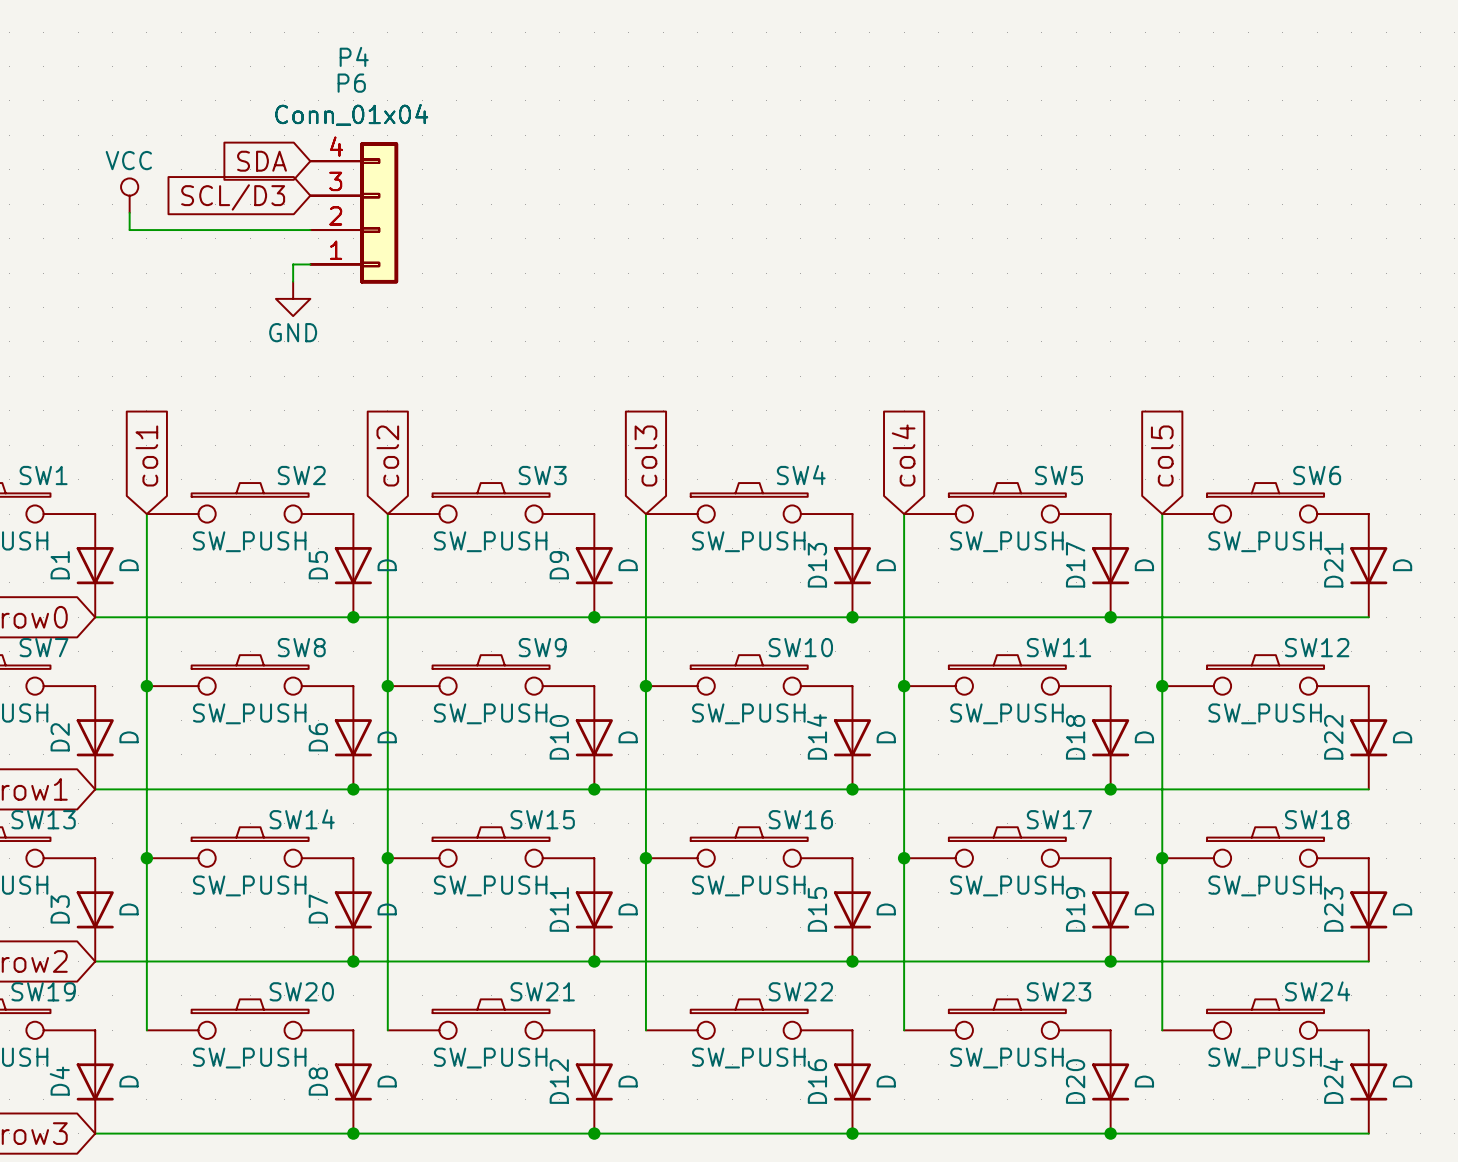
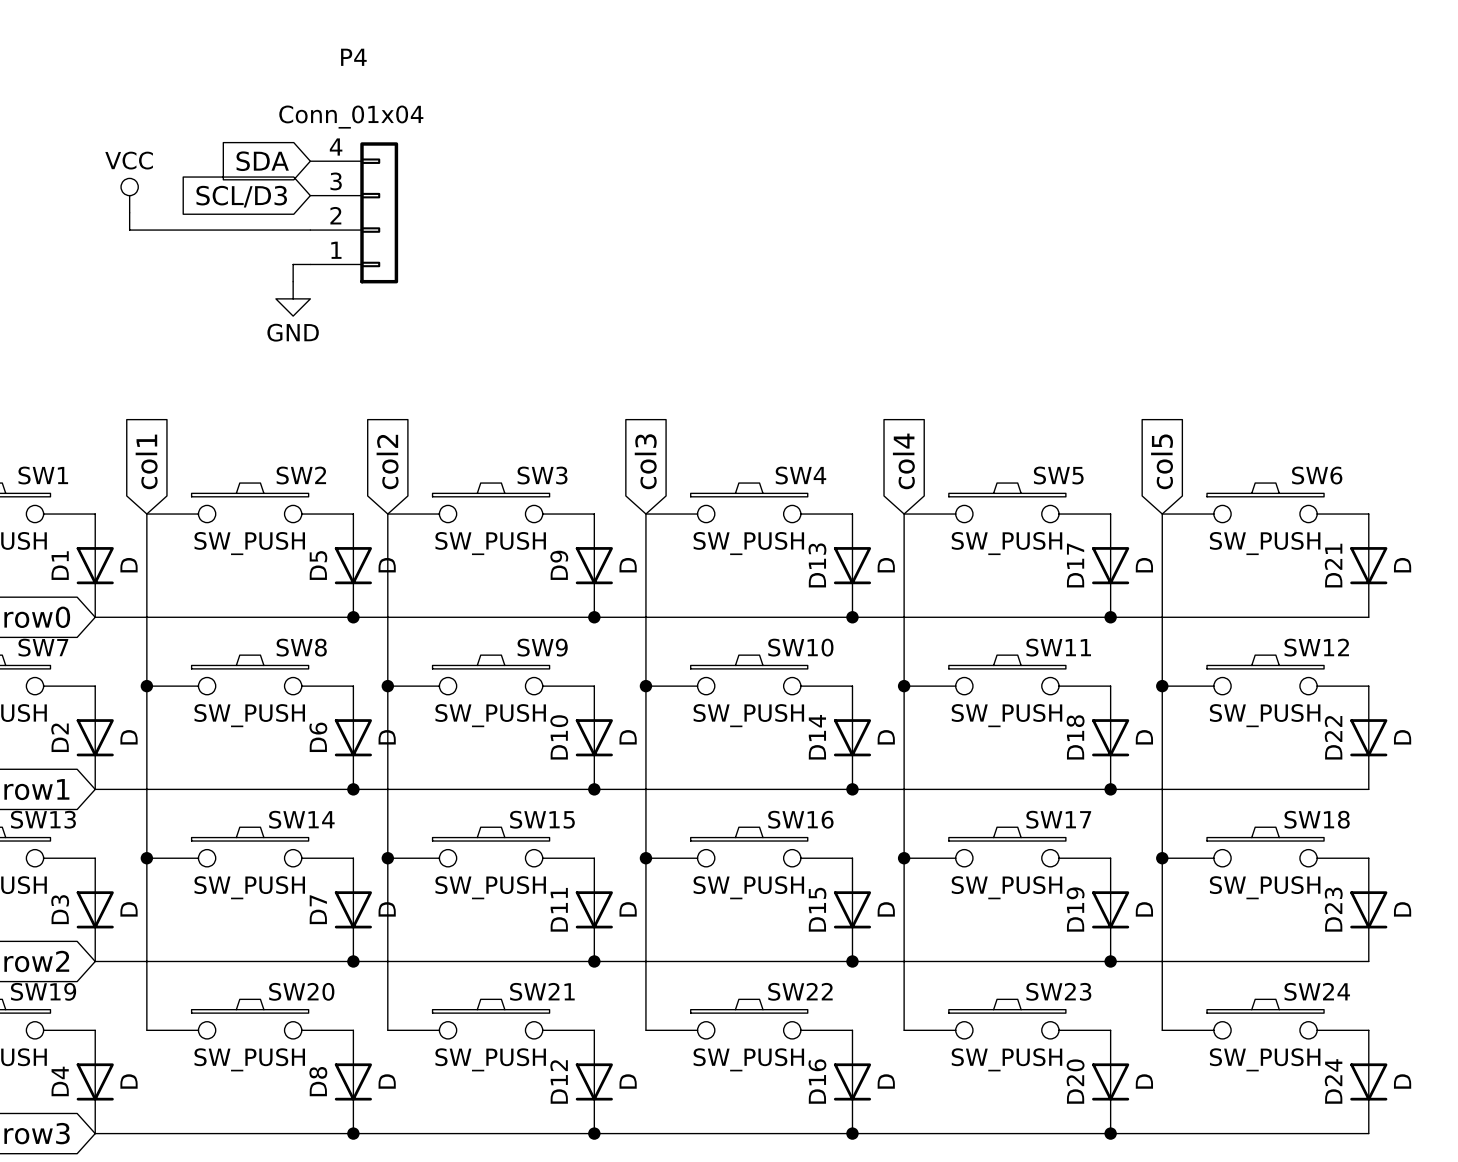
P6: Conn_01x04 (354, 212) -> none

